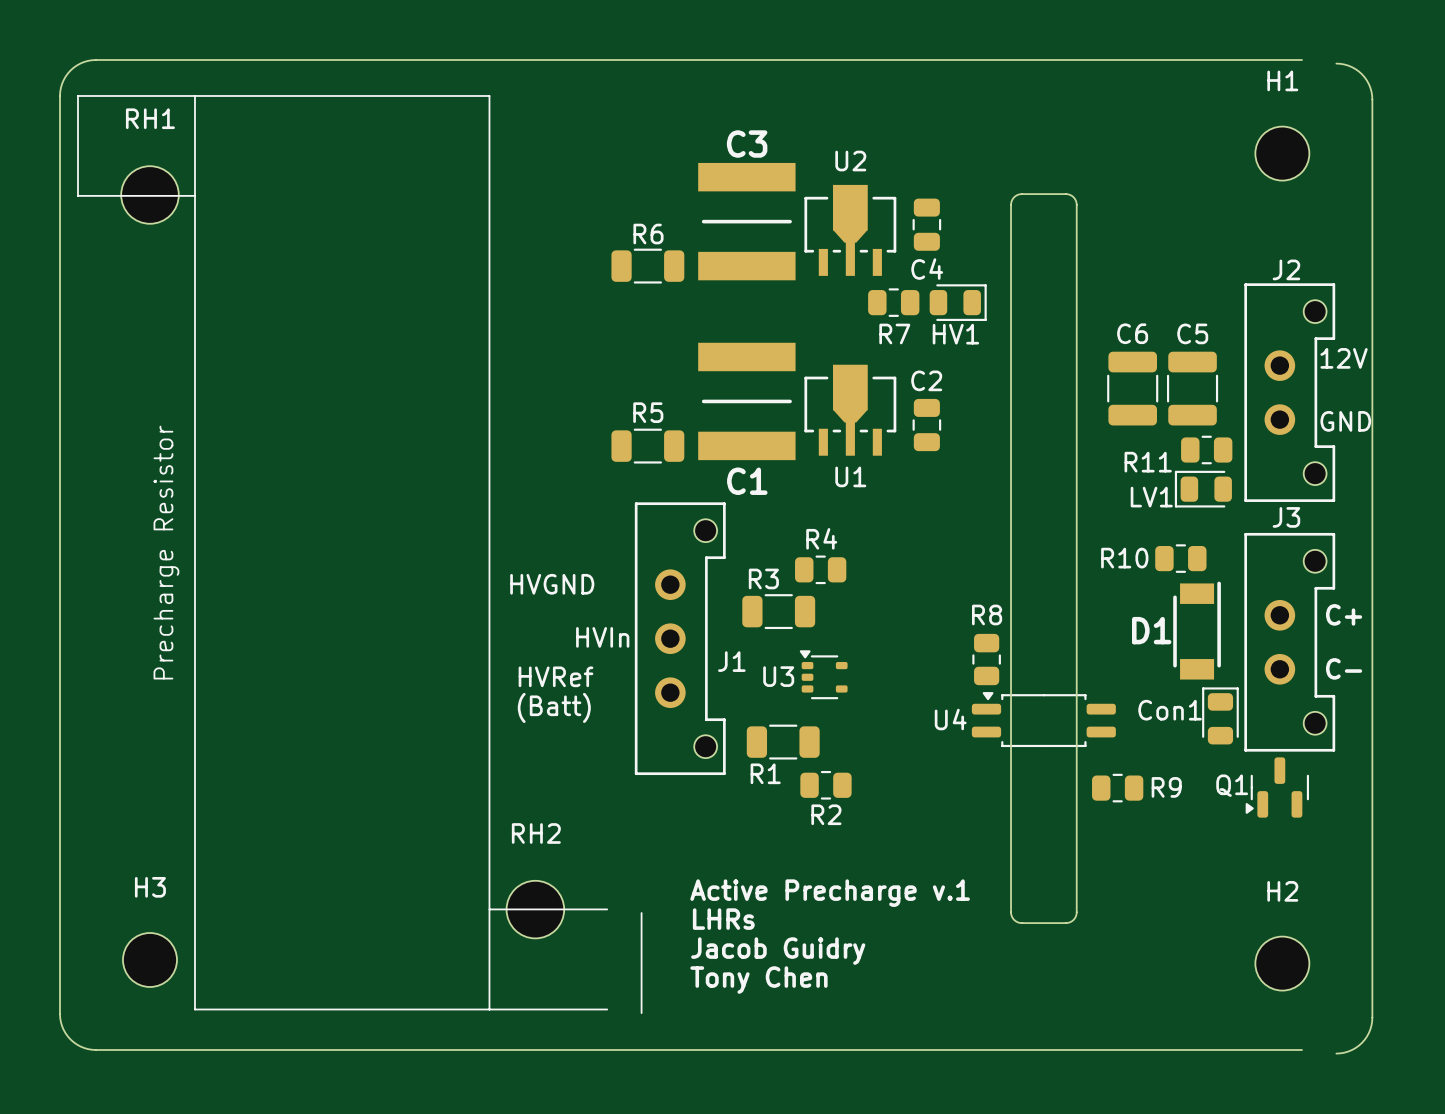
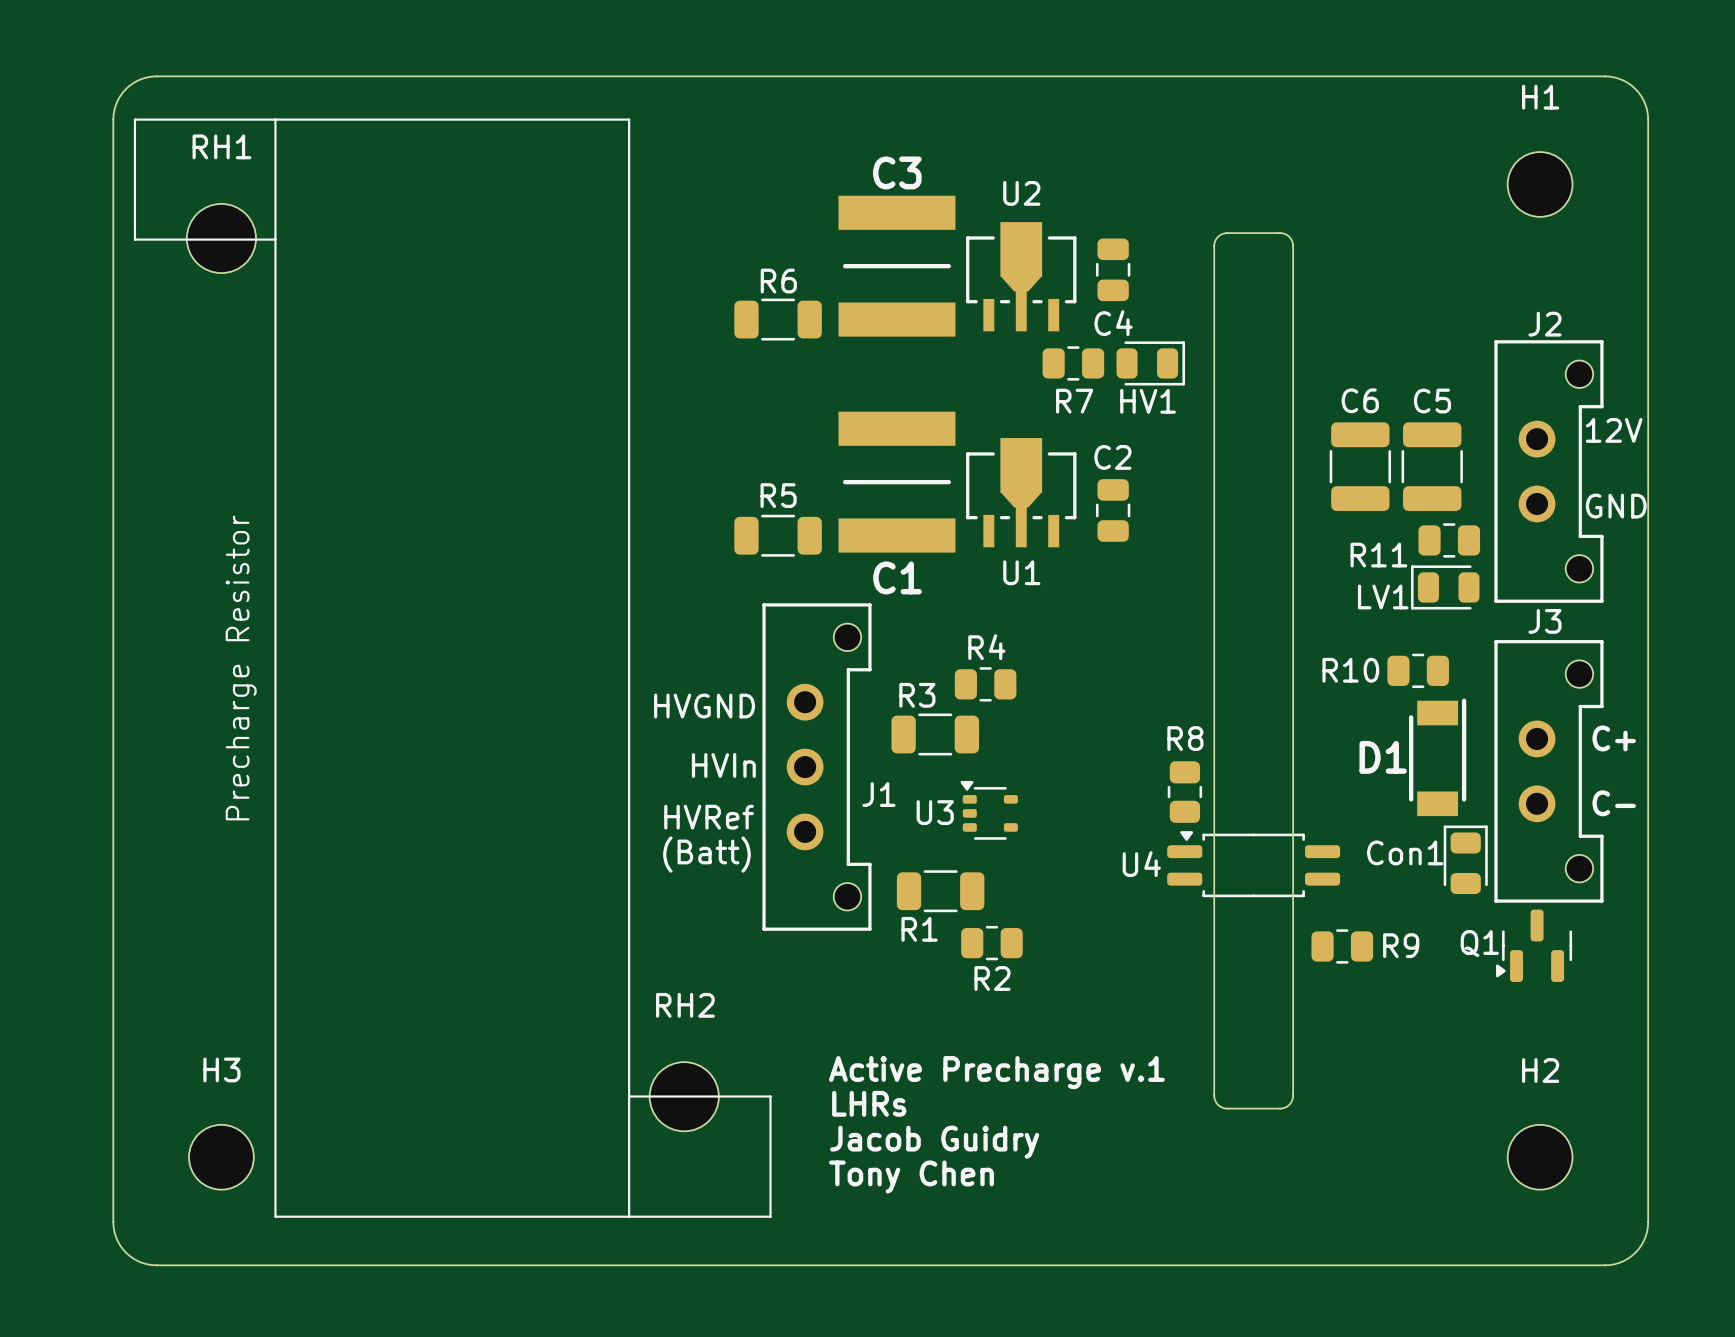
board edge: (1301, 59) (95, 59) (80, 63) (70, 70) (62, 84) (59, 95) (59, 1013) (63, 1029) (73, 1042) (84, 1047) (95, 1049) (1301, 1049) -> (1604, 76) (156, 76) (142, 78) (126, 89) (115, 105) (113, 119) (113, 1222) (117, 1240) (129, 1255) (142, 1262) (156, 1265) (1604, 1265)
line: (194, 95) (194, 1009) (607, 1009) -> (275, 119) (275, 1216) (770, 1216)
RH1 position: (149, 194) -> (221, 238)
line: (194, 195) (77, 195) (77, 95) (489, 95) (489, 1009) -> (275, 239) (134, 239) (134, 119) (629, 119) (629, 1216)
text position: Precharge Resistor (166, 552) -> Precharge Resistor (241, 667)
text position: HVGND (552, 584) -> HVGND (704, 706)
text position: HVRef (556, 676) -> HVRef (709, 817)
text position: (Batt) (554, 707) -> (Batt) (706, 854)
line: (489, 909) (607, 909) -> (629, 1096) (770, 1096)
RH2 position: (535, 909) -> (684, 1096)
H3 position: (149, 959) -> (221, 1157)

